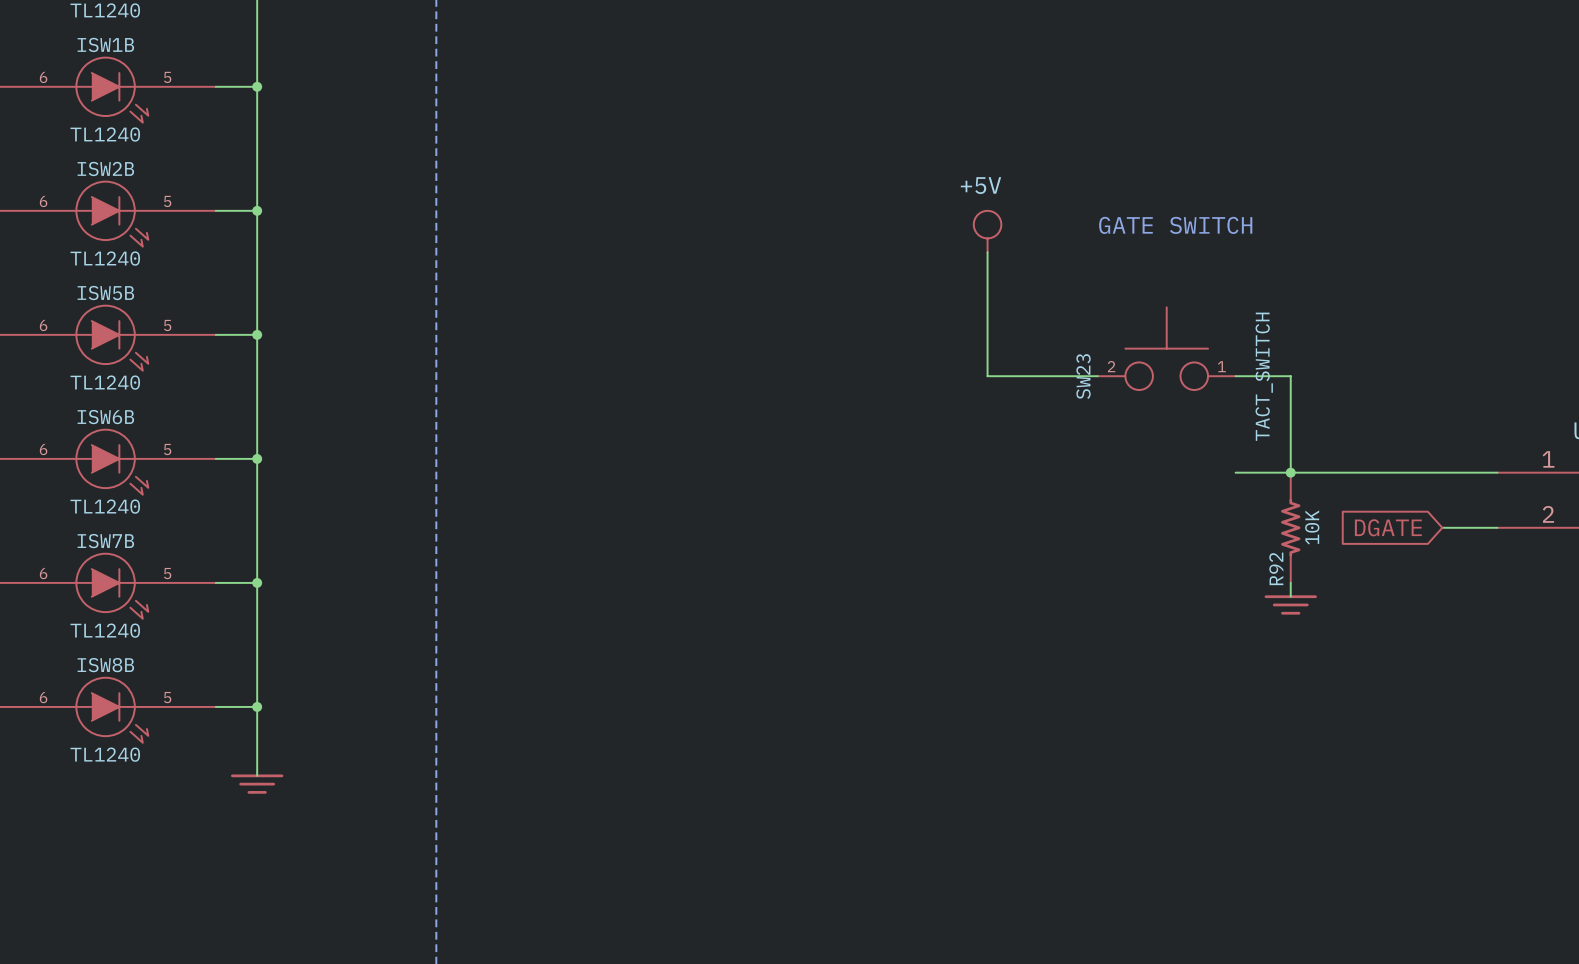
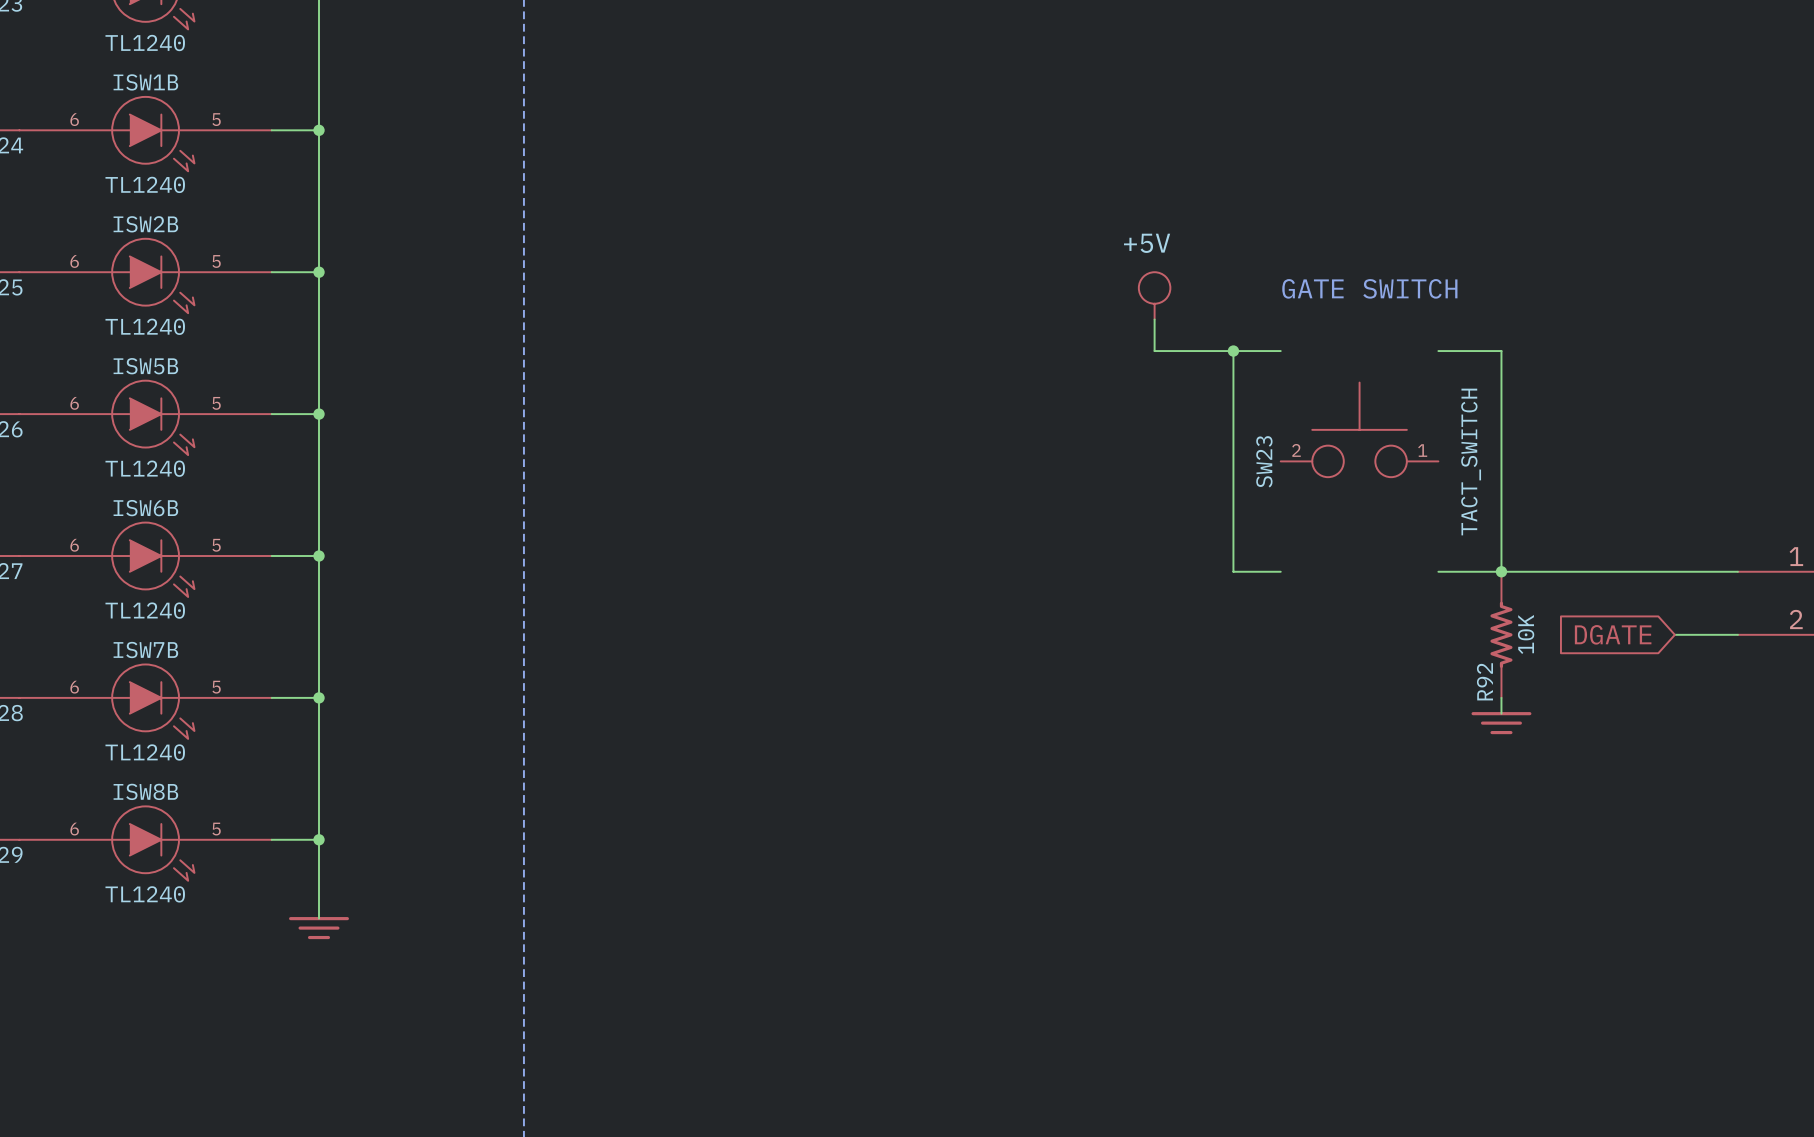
wire: (987, 279) (987, 376) (1097, 376) -> (1154, 351) (1280, 351)
wire: none -> (1233, 351) (1233, 571) (1280, 571)
junction: none -> (1233, 351)
wire: (1235, 376) (1290, 376) -> (1438, 351) (1501, 351) (1501, 461)

